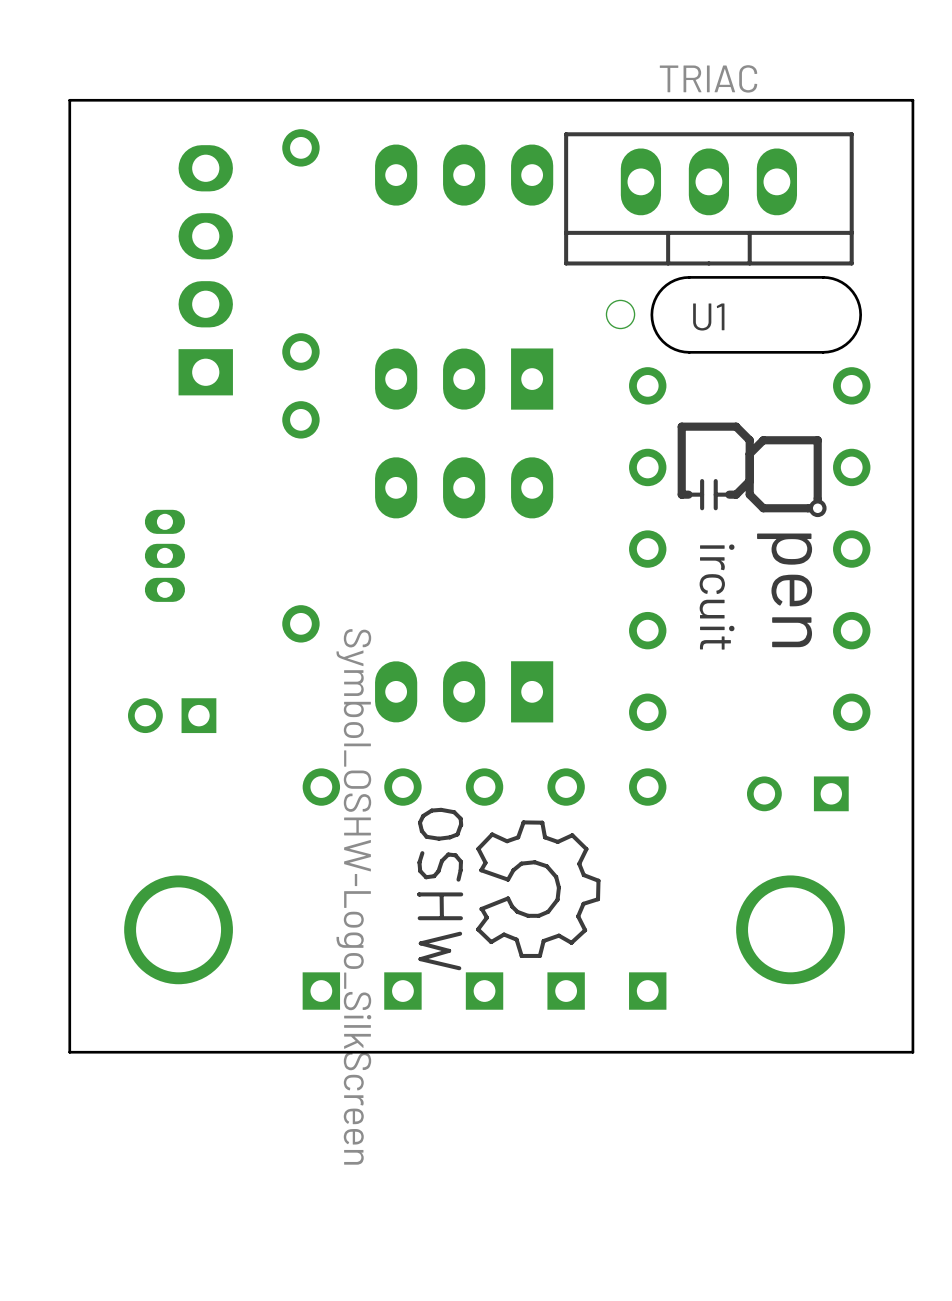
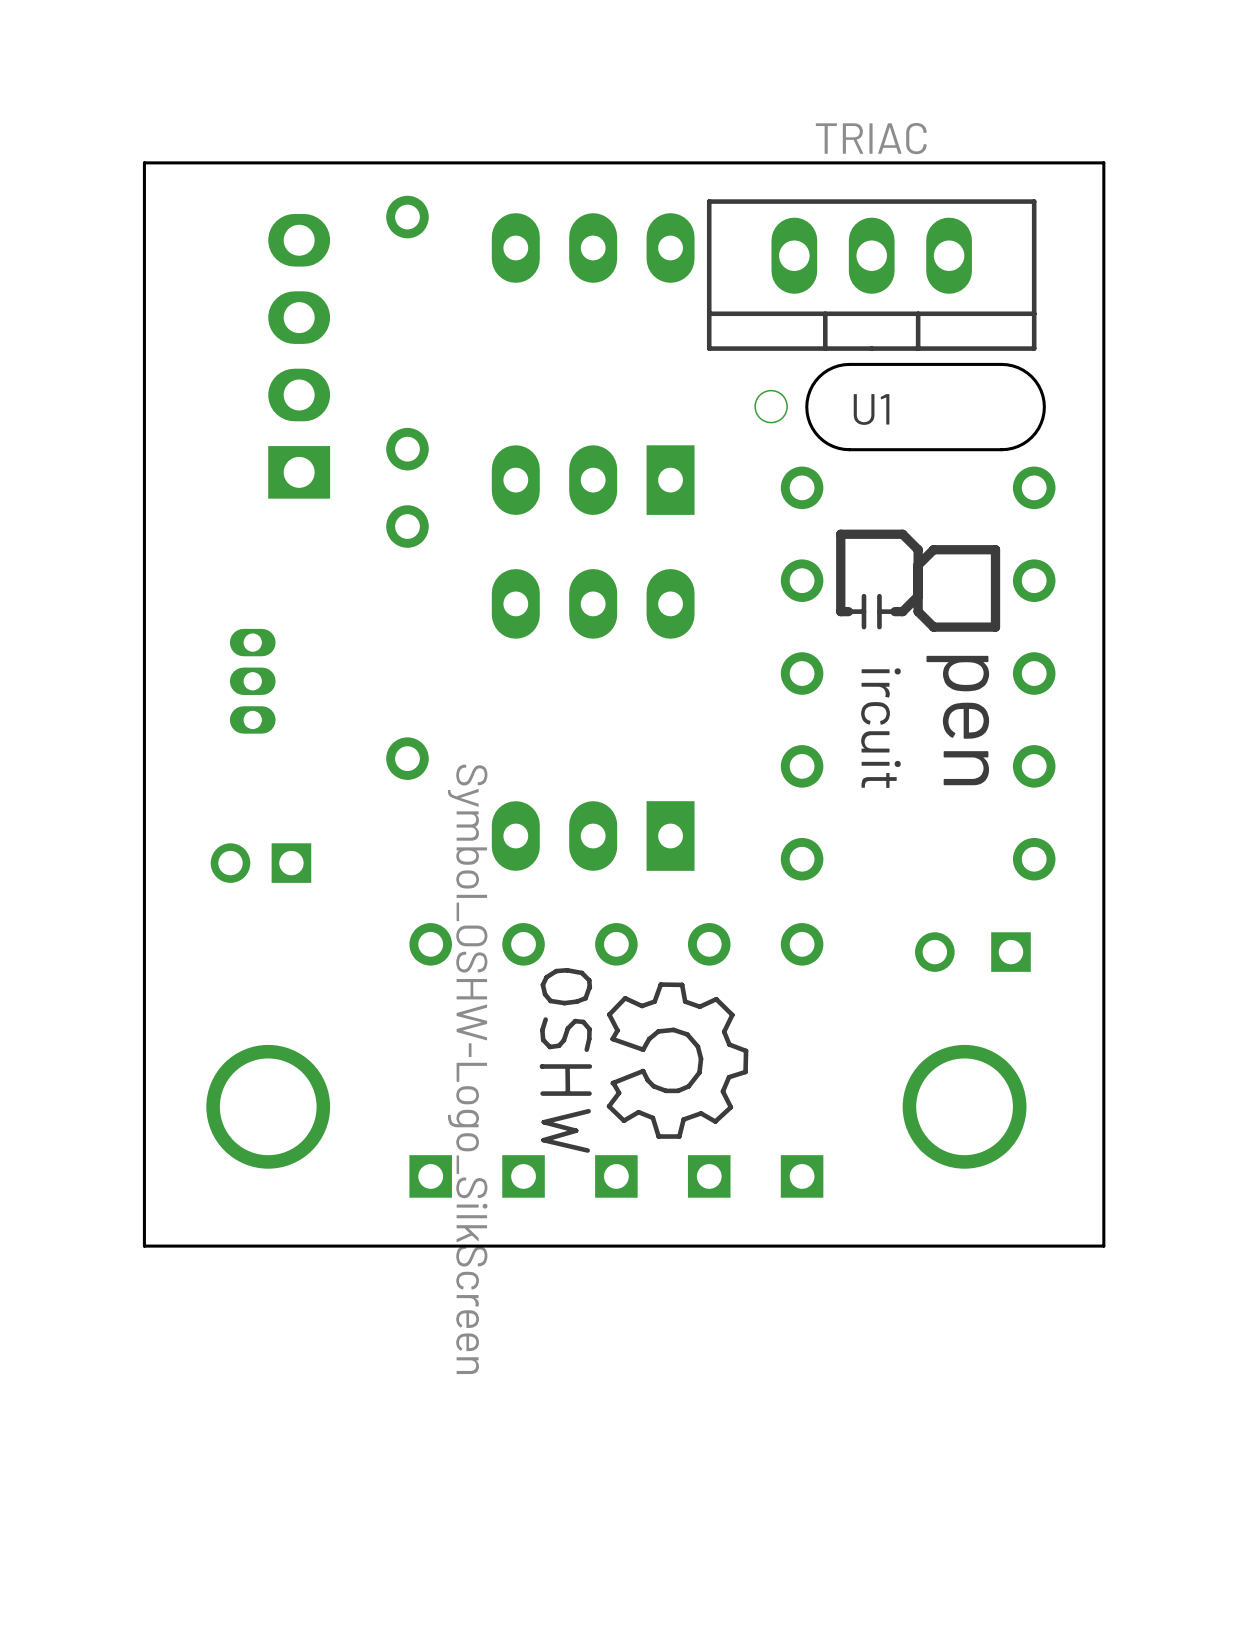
drawing shape: [677, 422, 827, 650] -> [836, 529, 1001, 788]

